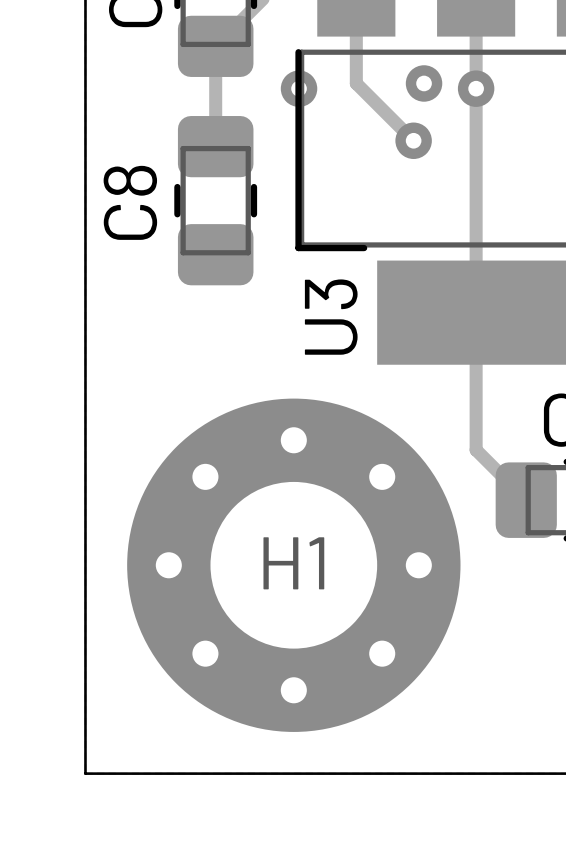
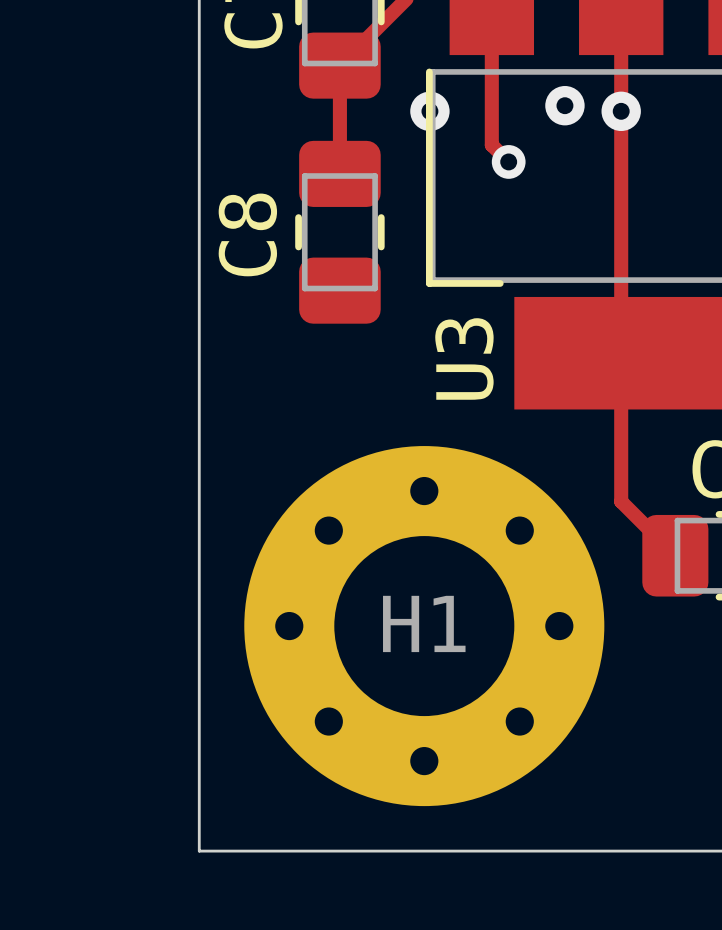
track: (356, 83) (413, 140) -> (491, 105) (491, 145) (508, 161)
via: none -> (508, 161)
via: (413, 140) -> none

